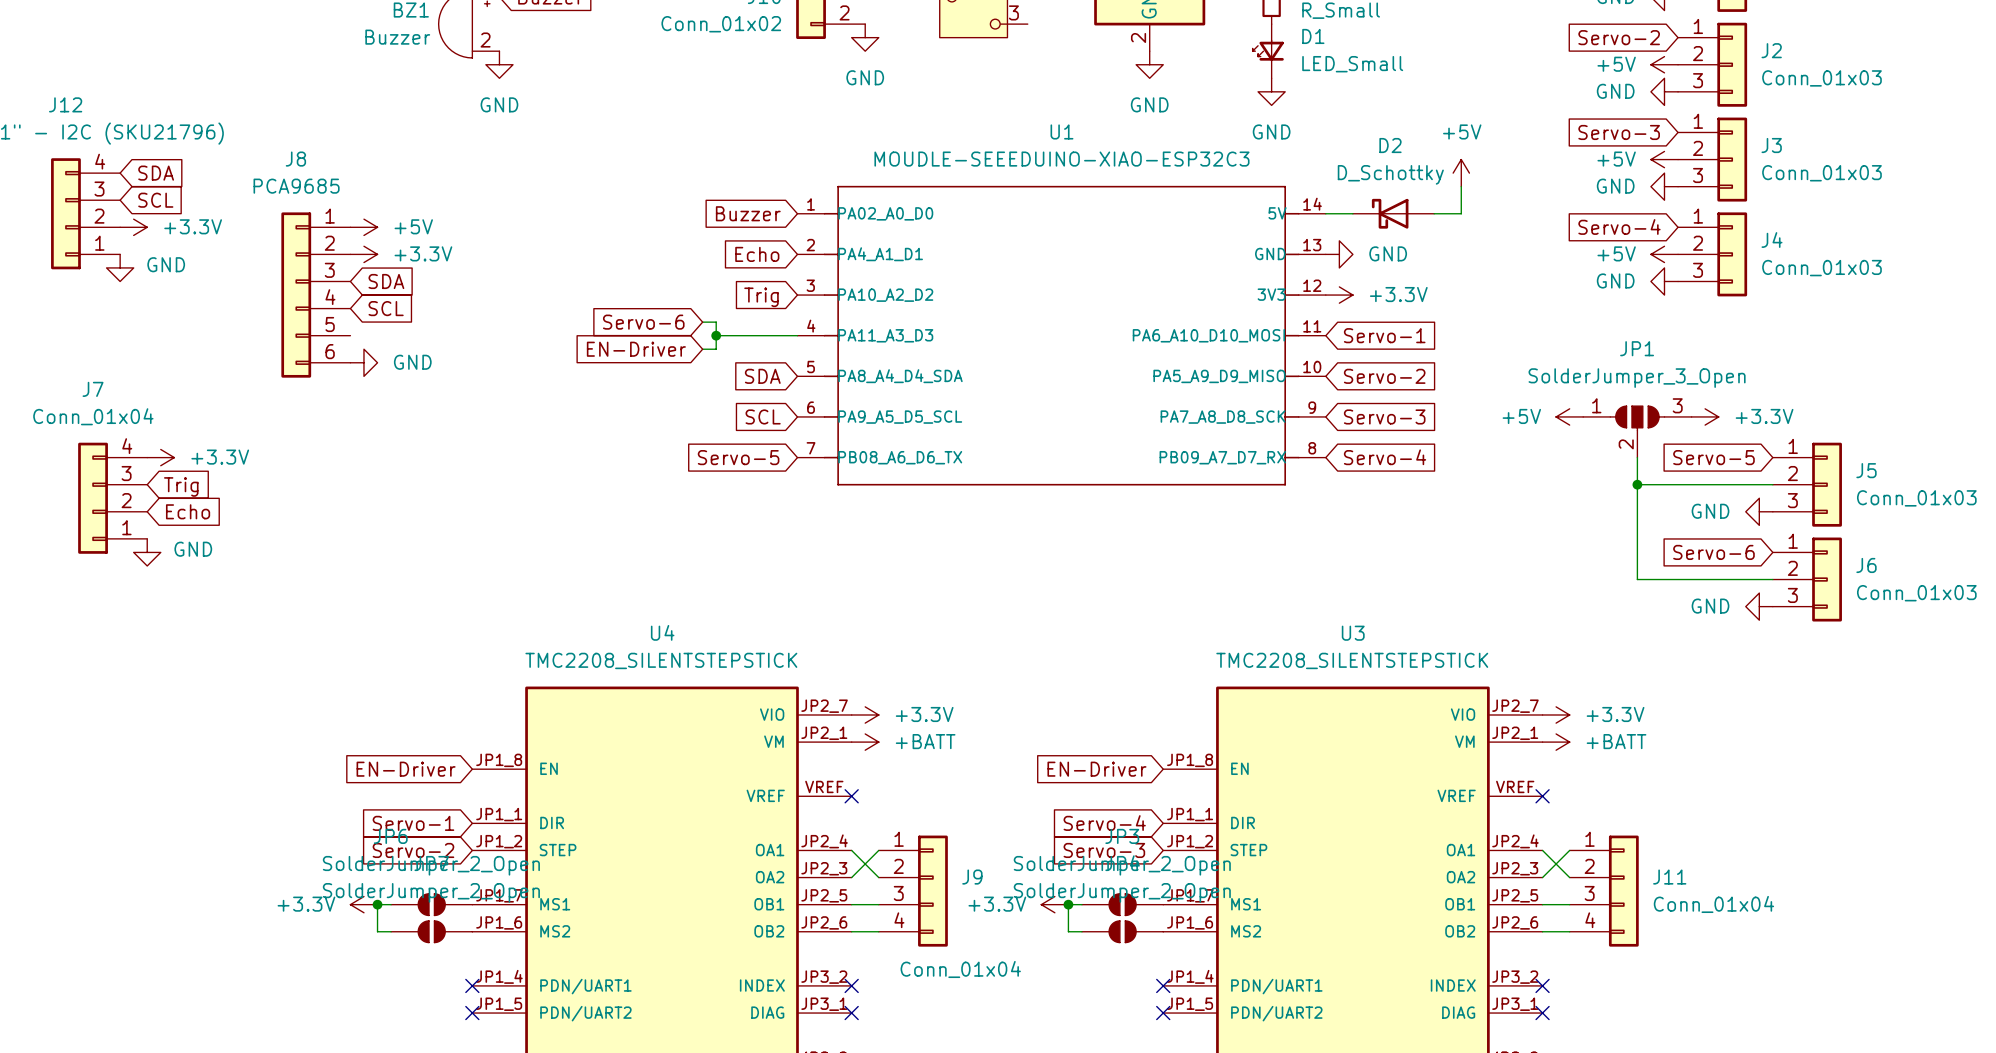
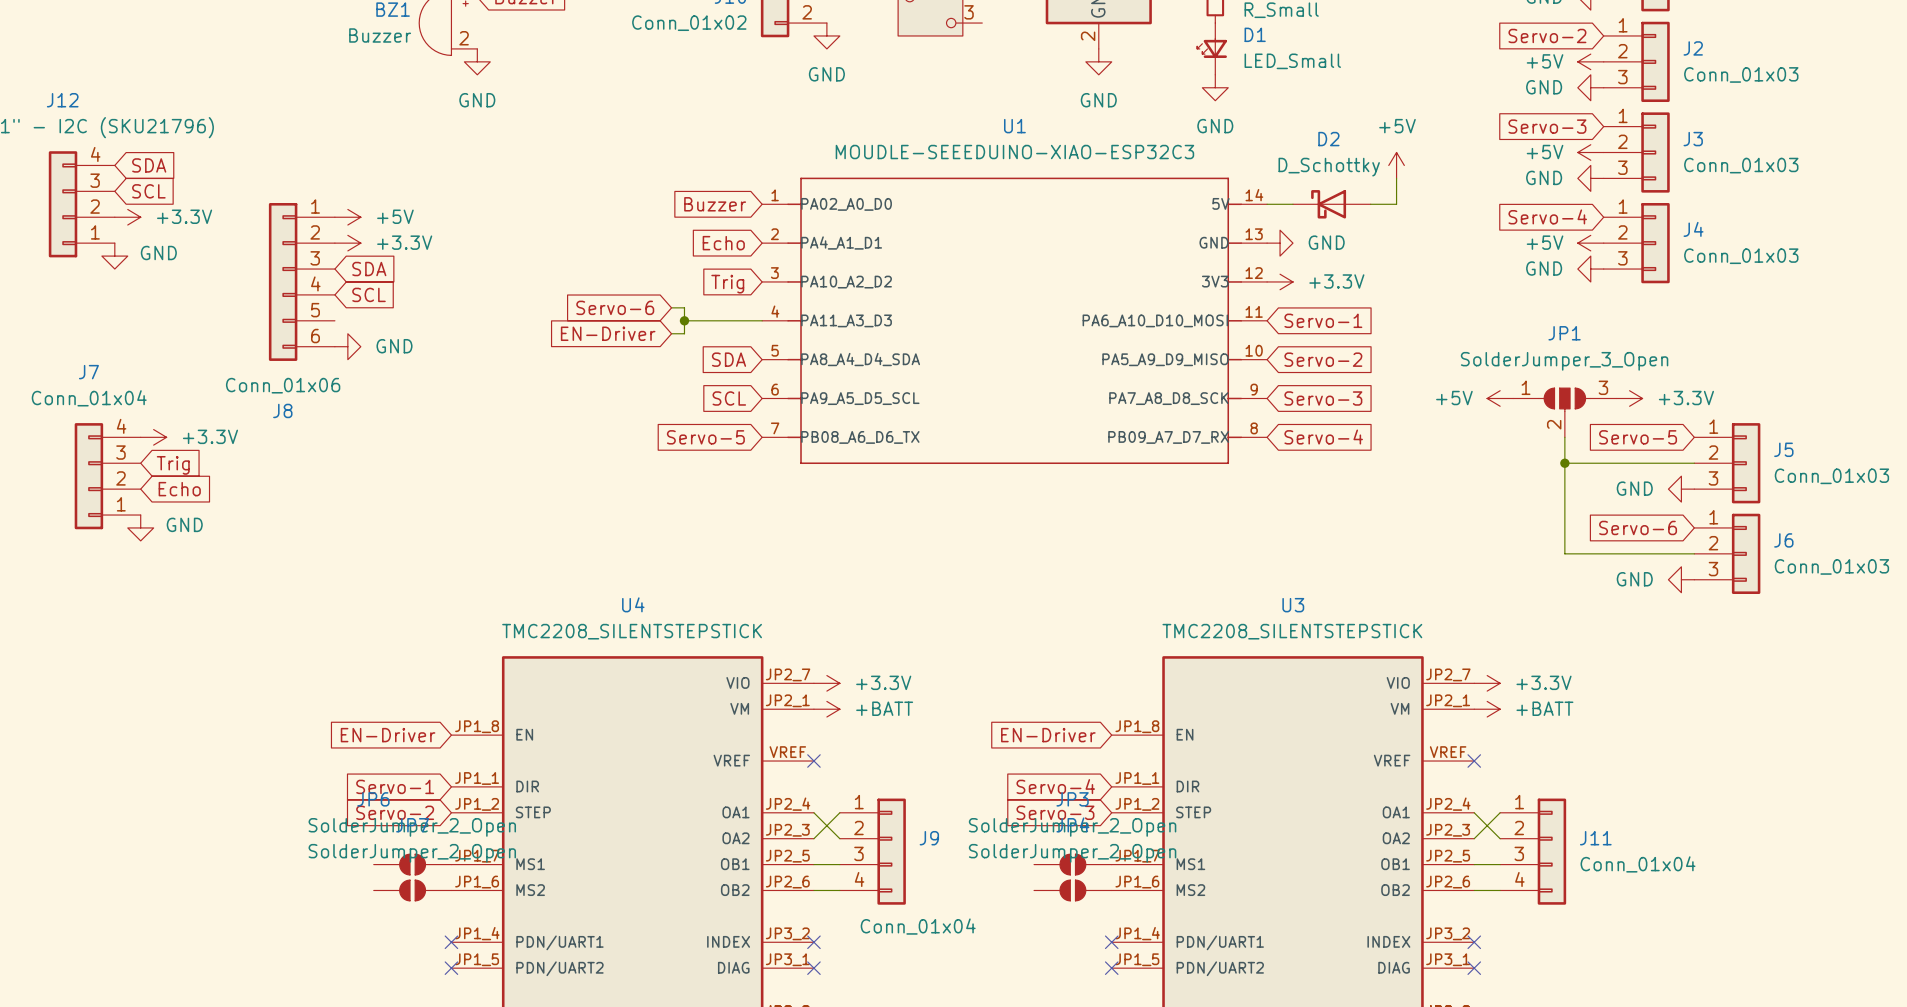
J8 name position: J8 (295, 159) -> J8 (282, 410)
J8 value: PCA9685 (296, 186) -> Conn_01x06 (283, 385)
power symbol: +3.3V (363, 904) -> none
junction: (377, 904) -> none
wire: (391, 904) (377, 904) (377, 931) (391, 931) -> none
power symbol: +3.3V (1054, 904) -> none
junction: (1068, 904) -> none
wire: (1081, 904) (1068, 904) (1068, 931) (1081, 931) -> none

